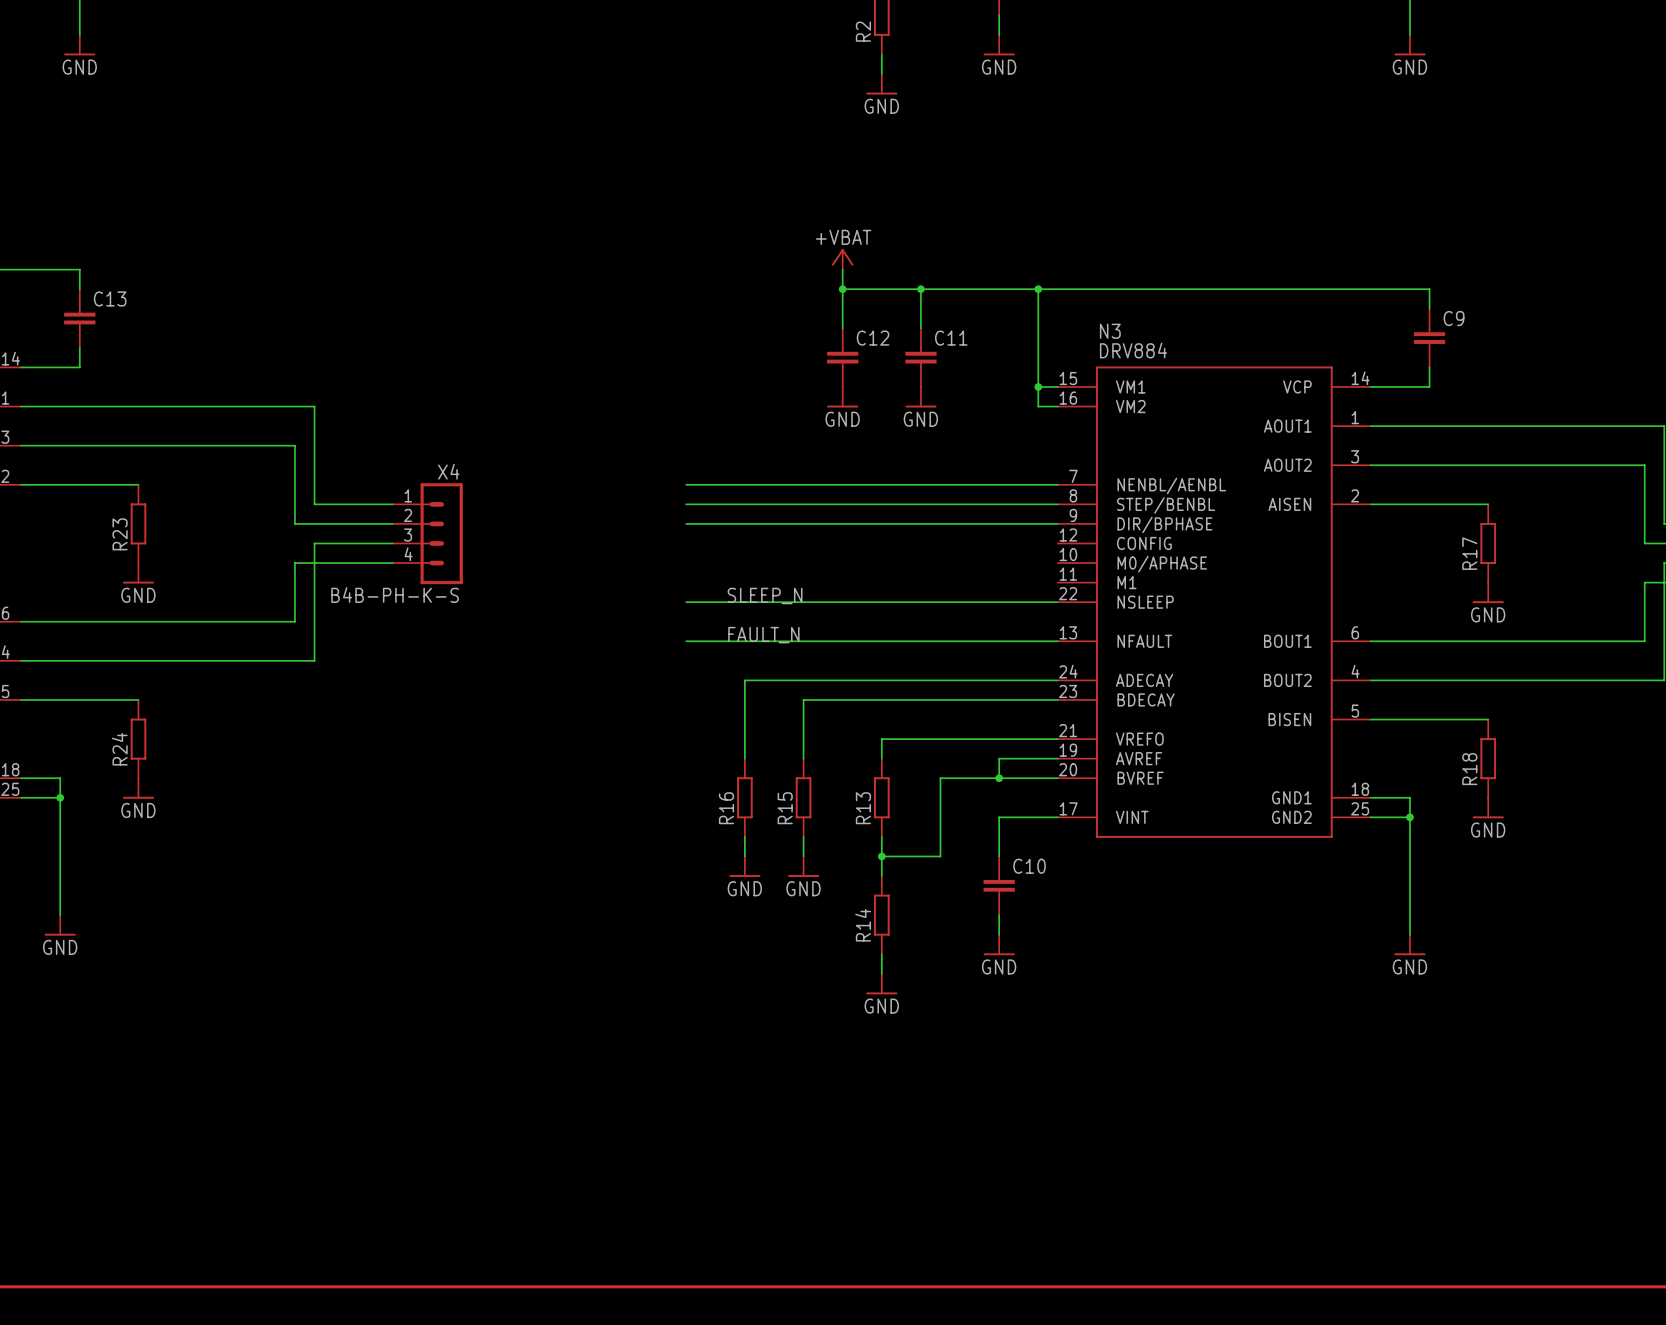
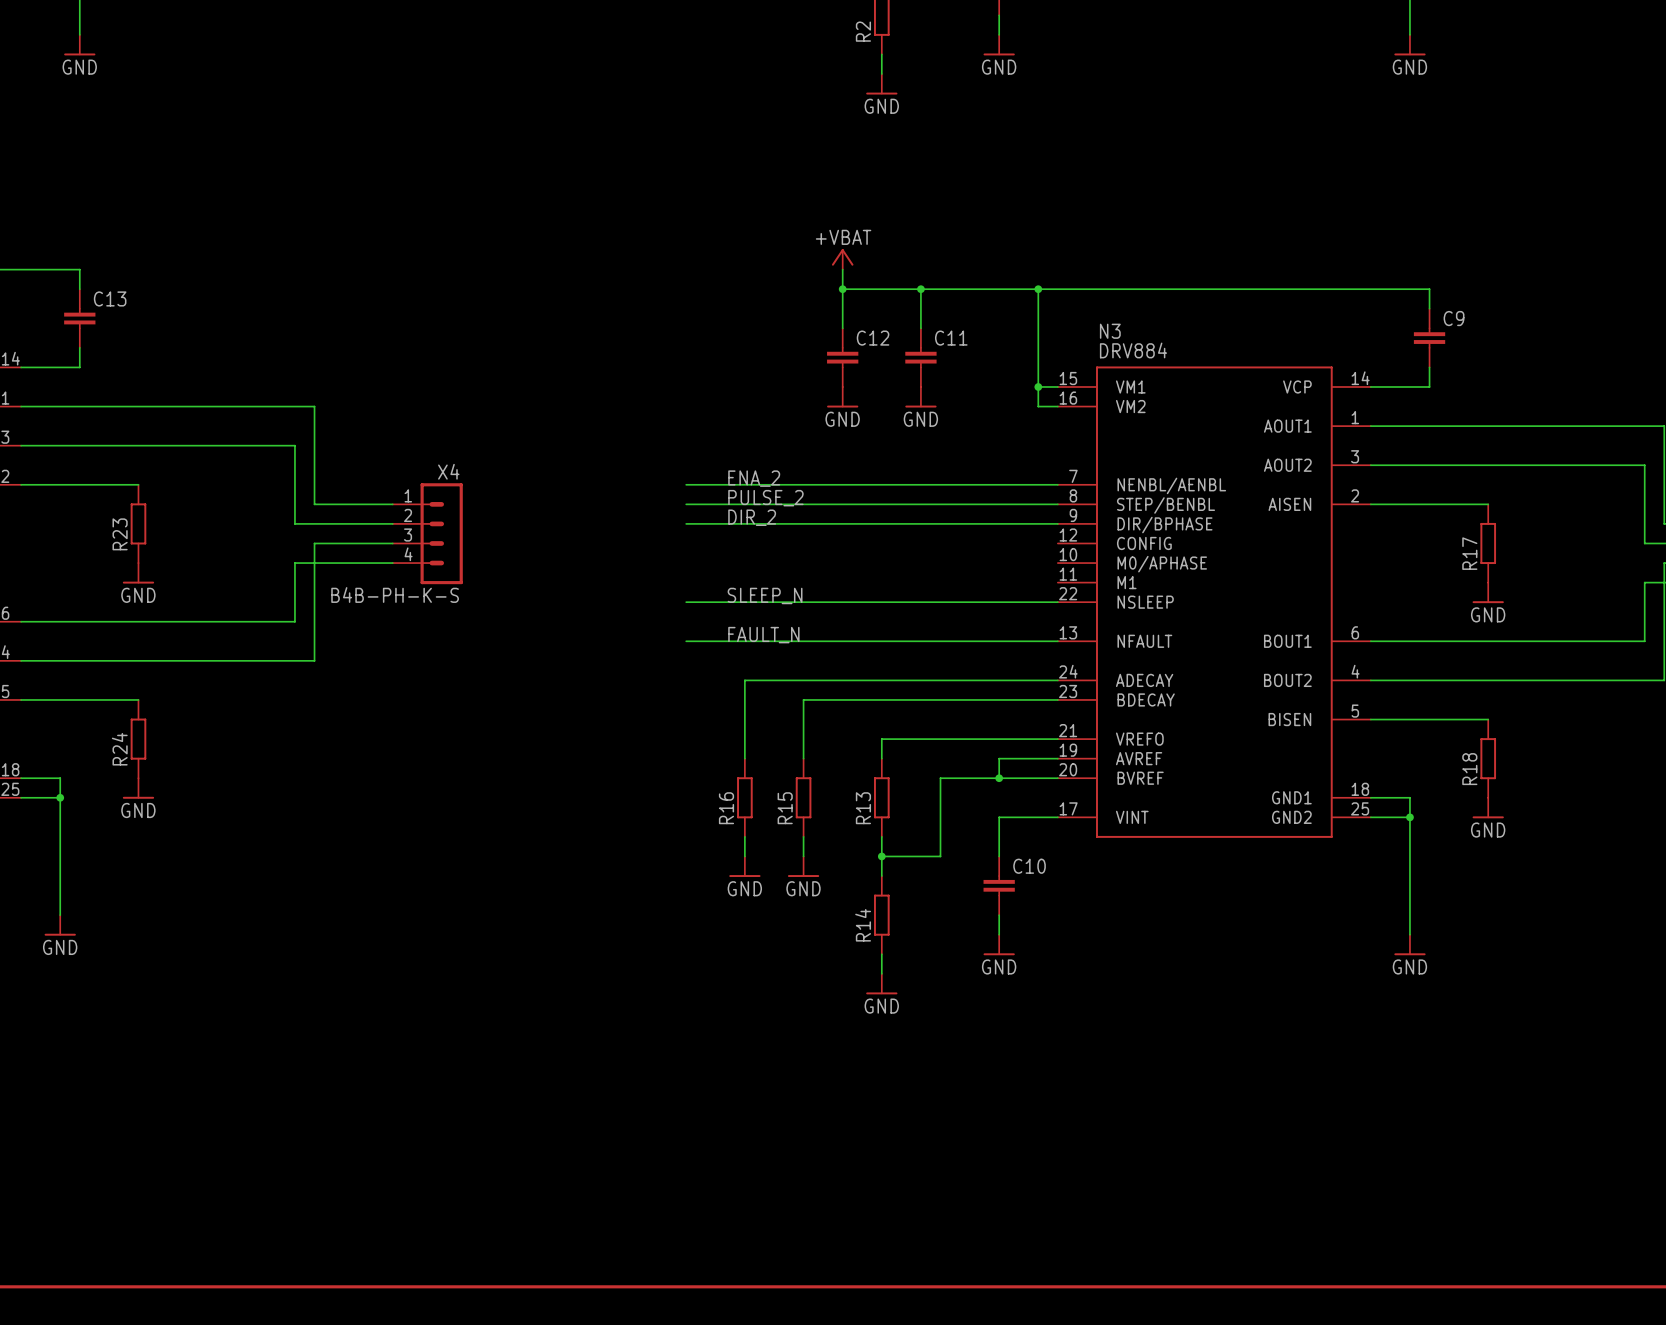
label: none -> ENA_2 (754, 478)
label: none -> PULSE_2 (765, 498)
label: none -> DIR_2 (752, 517)

